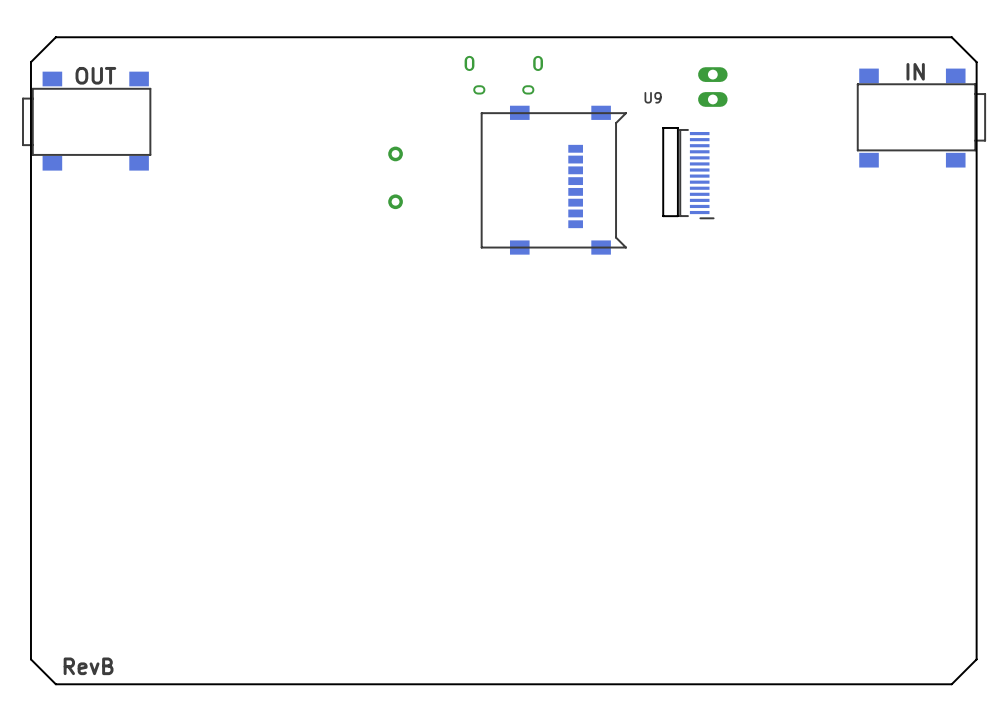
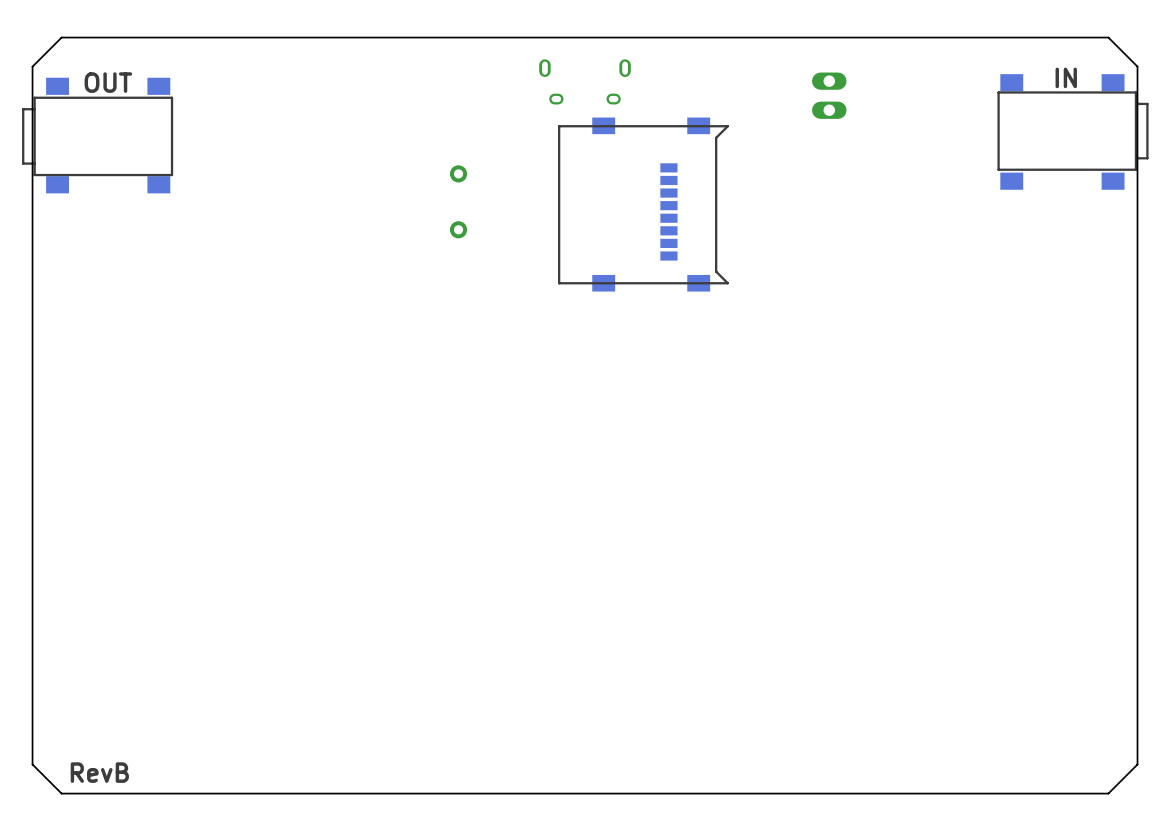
board edge: (677, 127) (677, 216) (663, 216) (663, 127) (677, 127) -> none
U9: (696, 174) -> none

